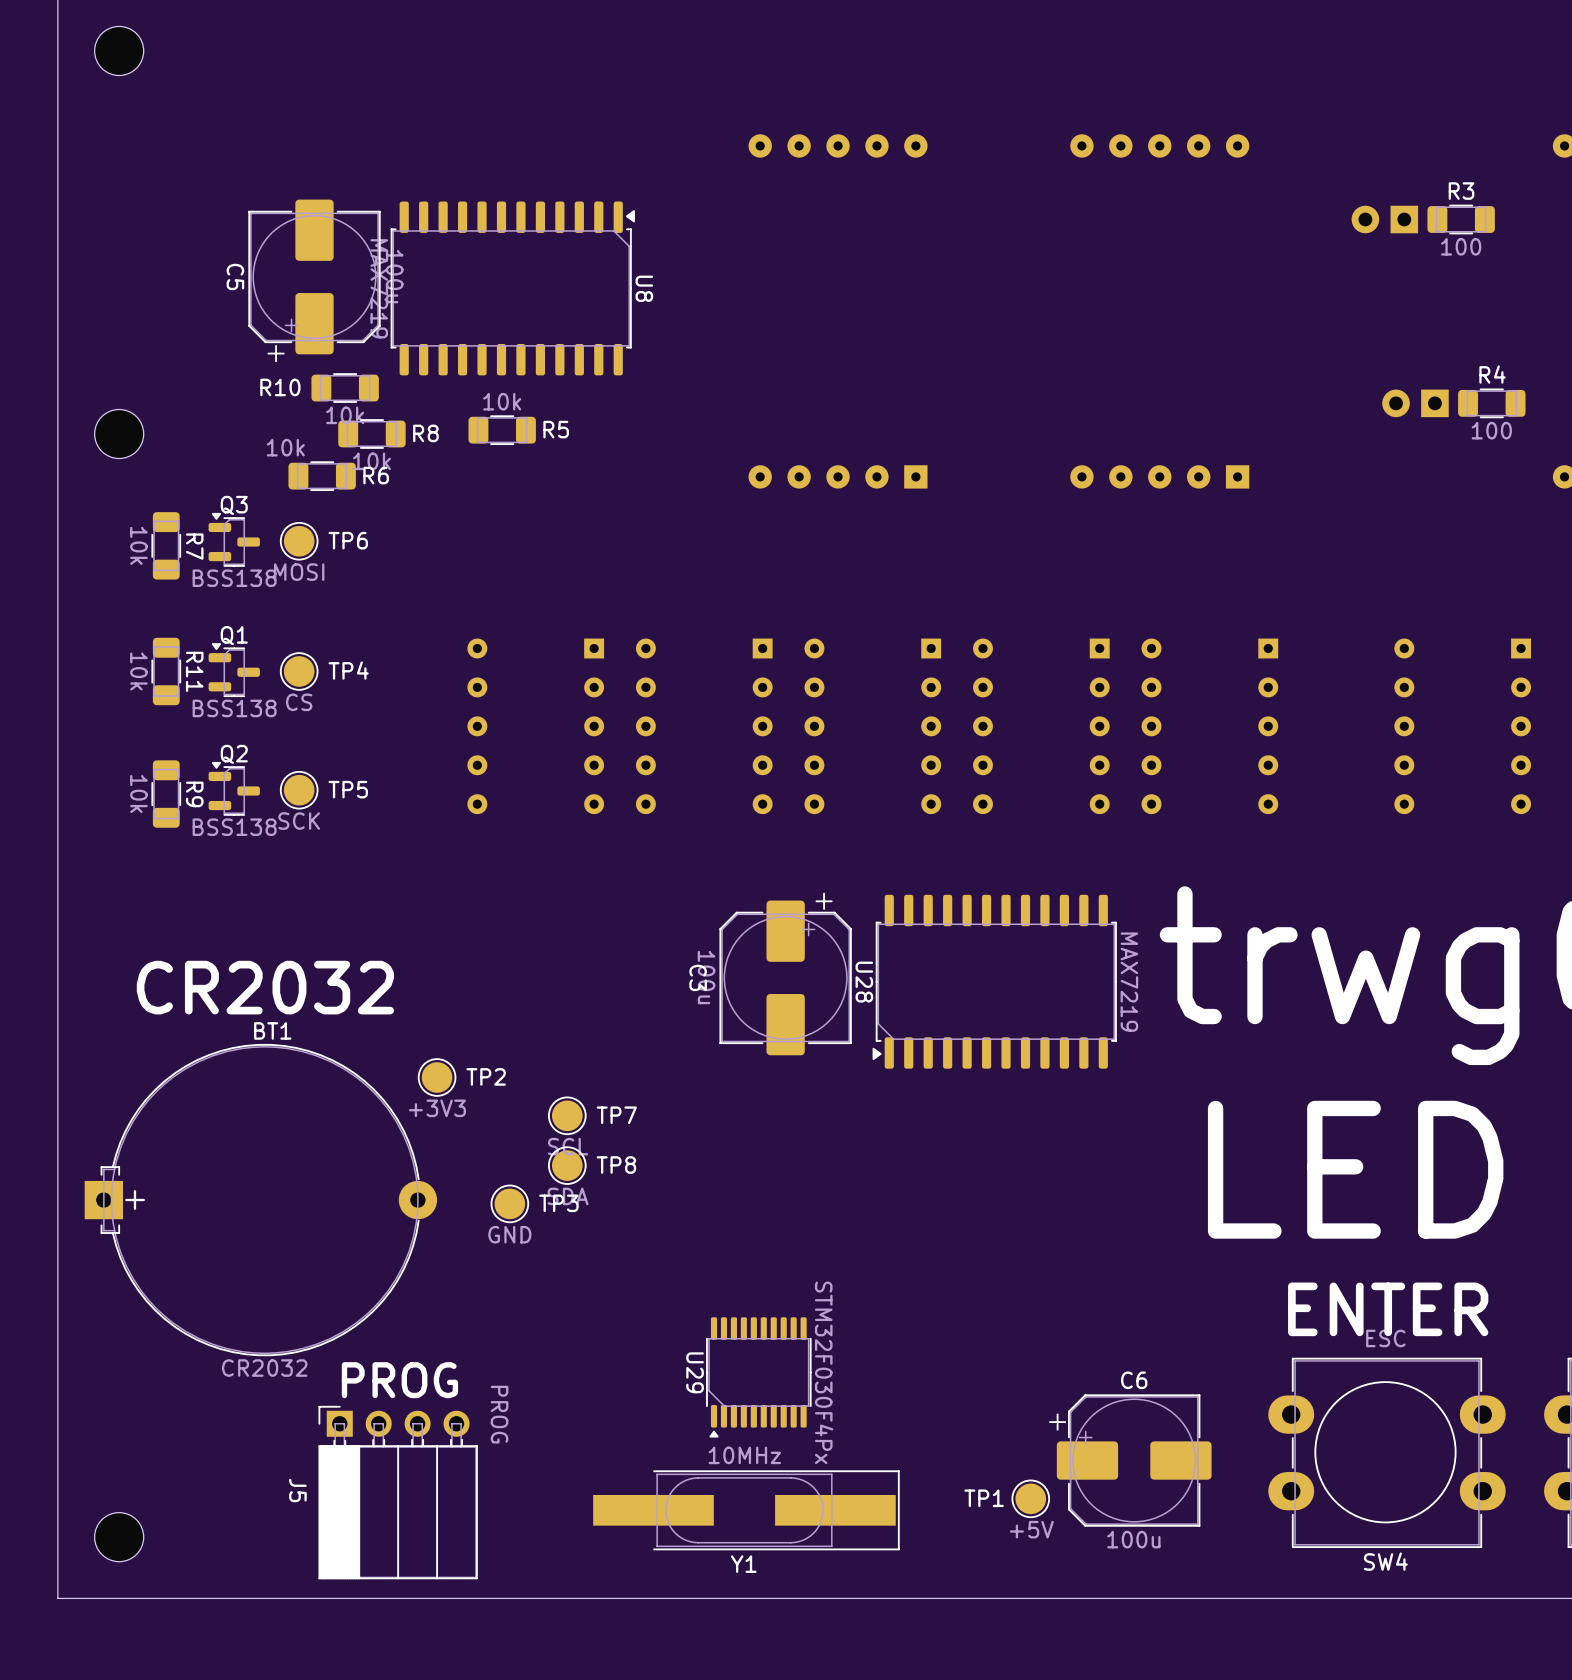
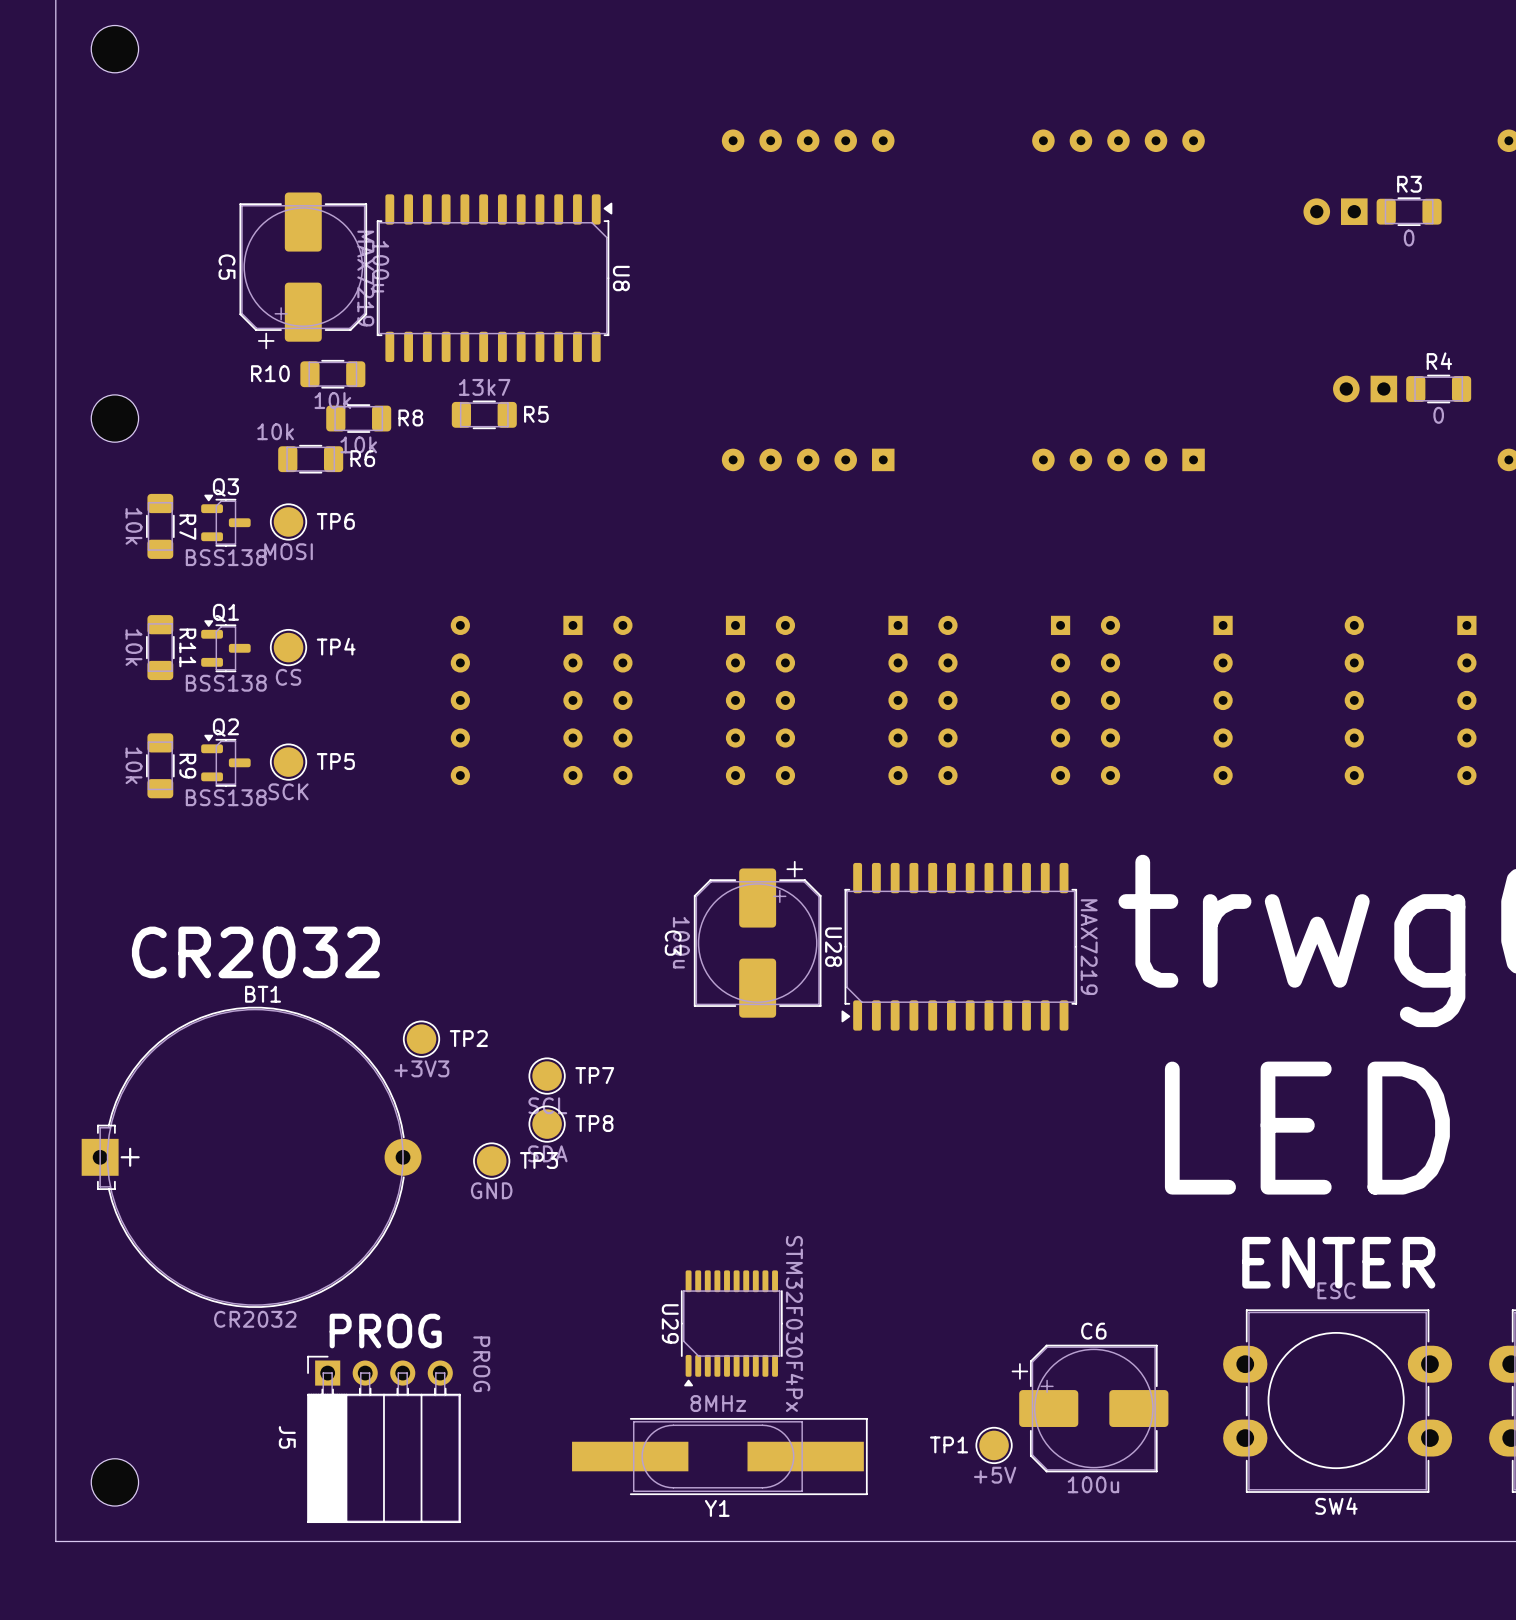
R3 value: 100 (1461, 246) -> 0 (1409, 238)
R5 value: 10k (502, 401) -> 13k7 (484, 387)
R4 value: 100 (1491, 430) -> 0 (1438, 415)
Y1 value: 10MHz (744, 1455) -> 8MHz (718, 1403)

